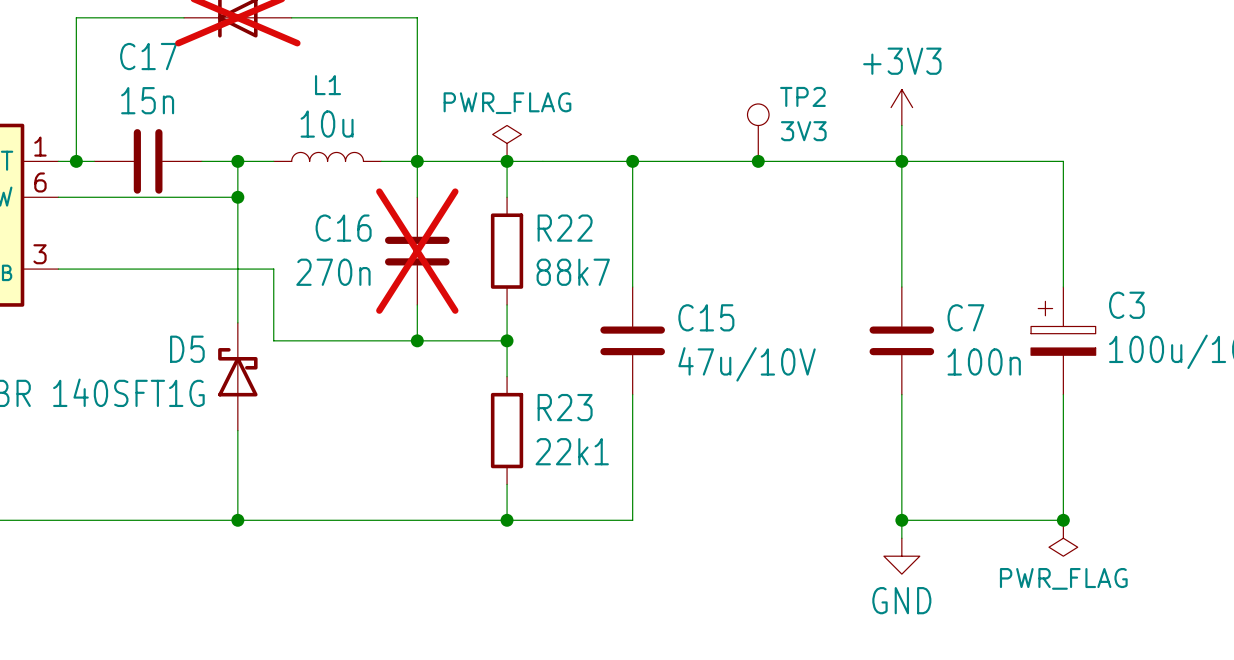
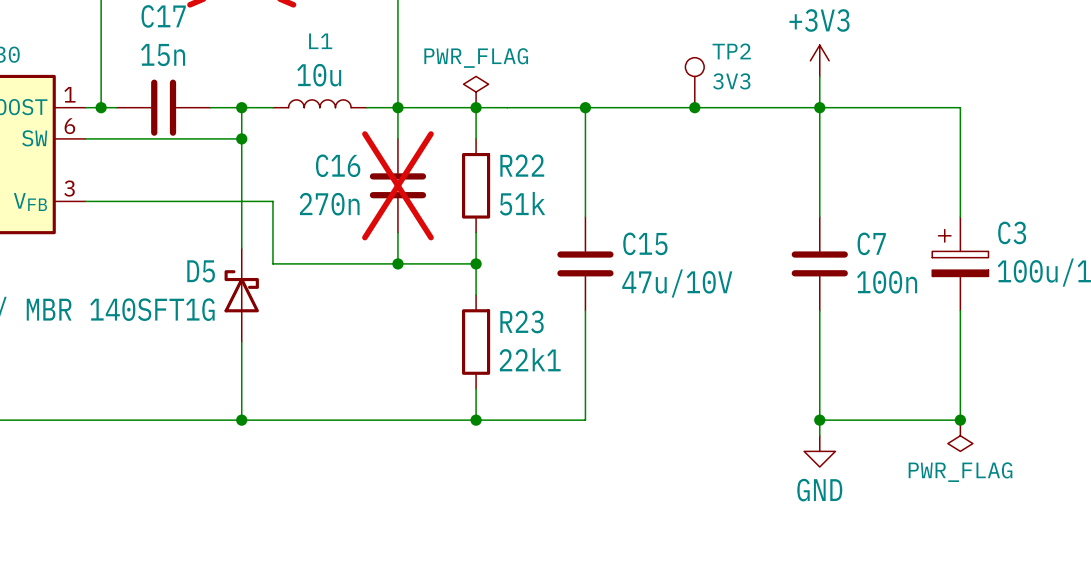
R22 value: 88k7 (573, 272) -> 51k (522, 203)

